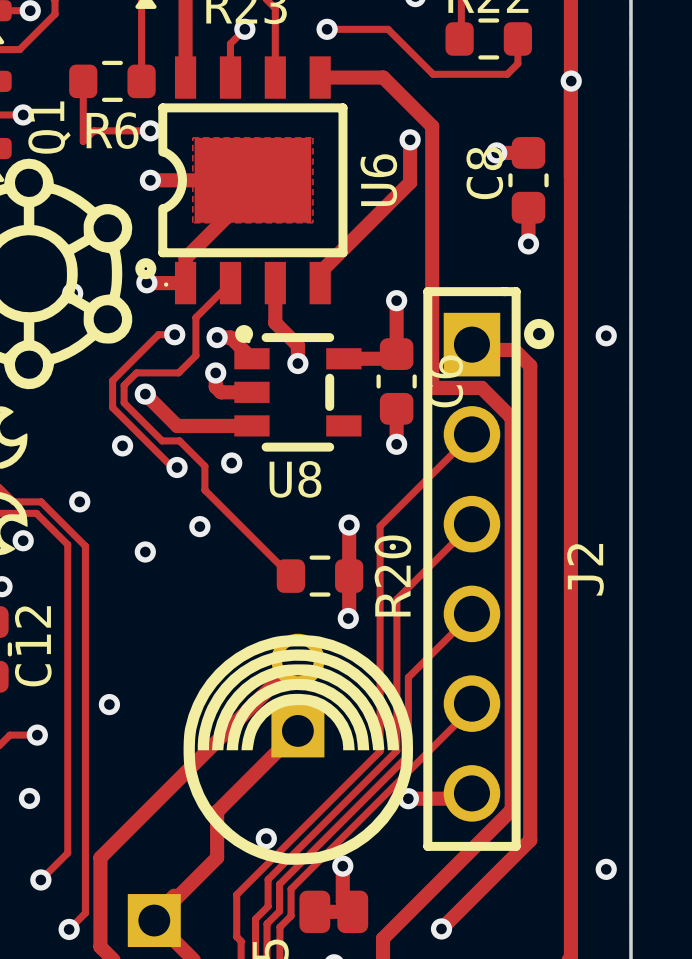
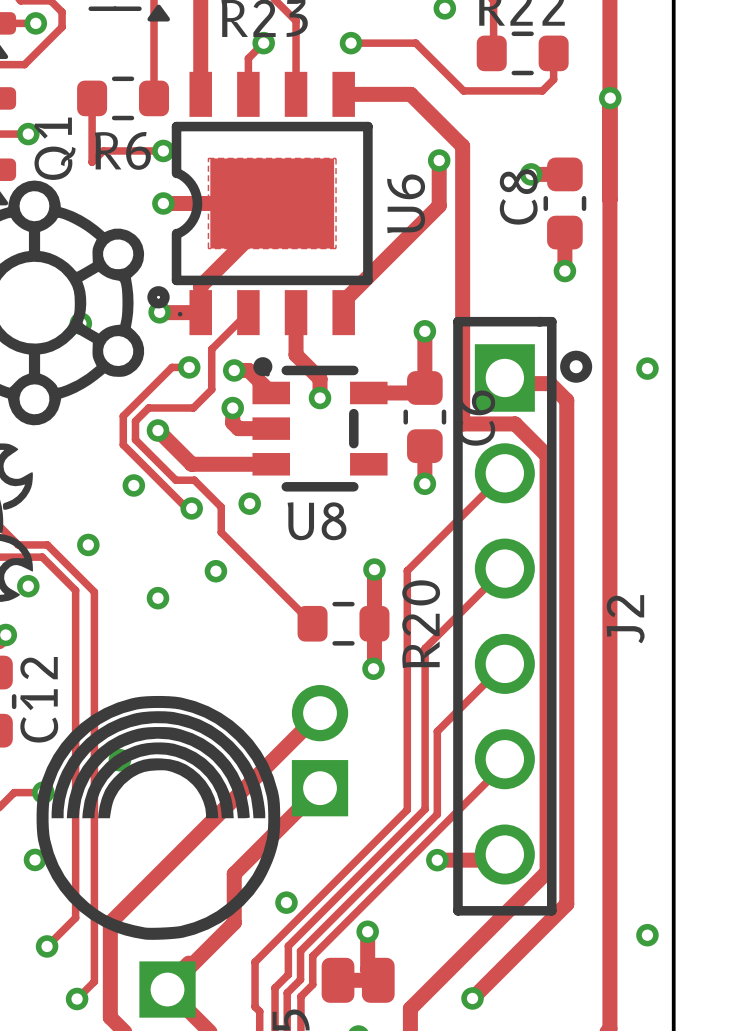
drawing position: (298, 749) -> (158, 817)

